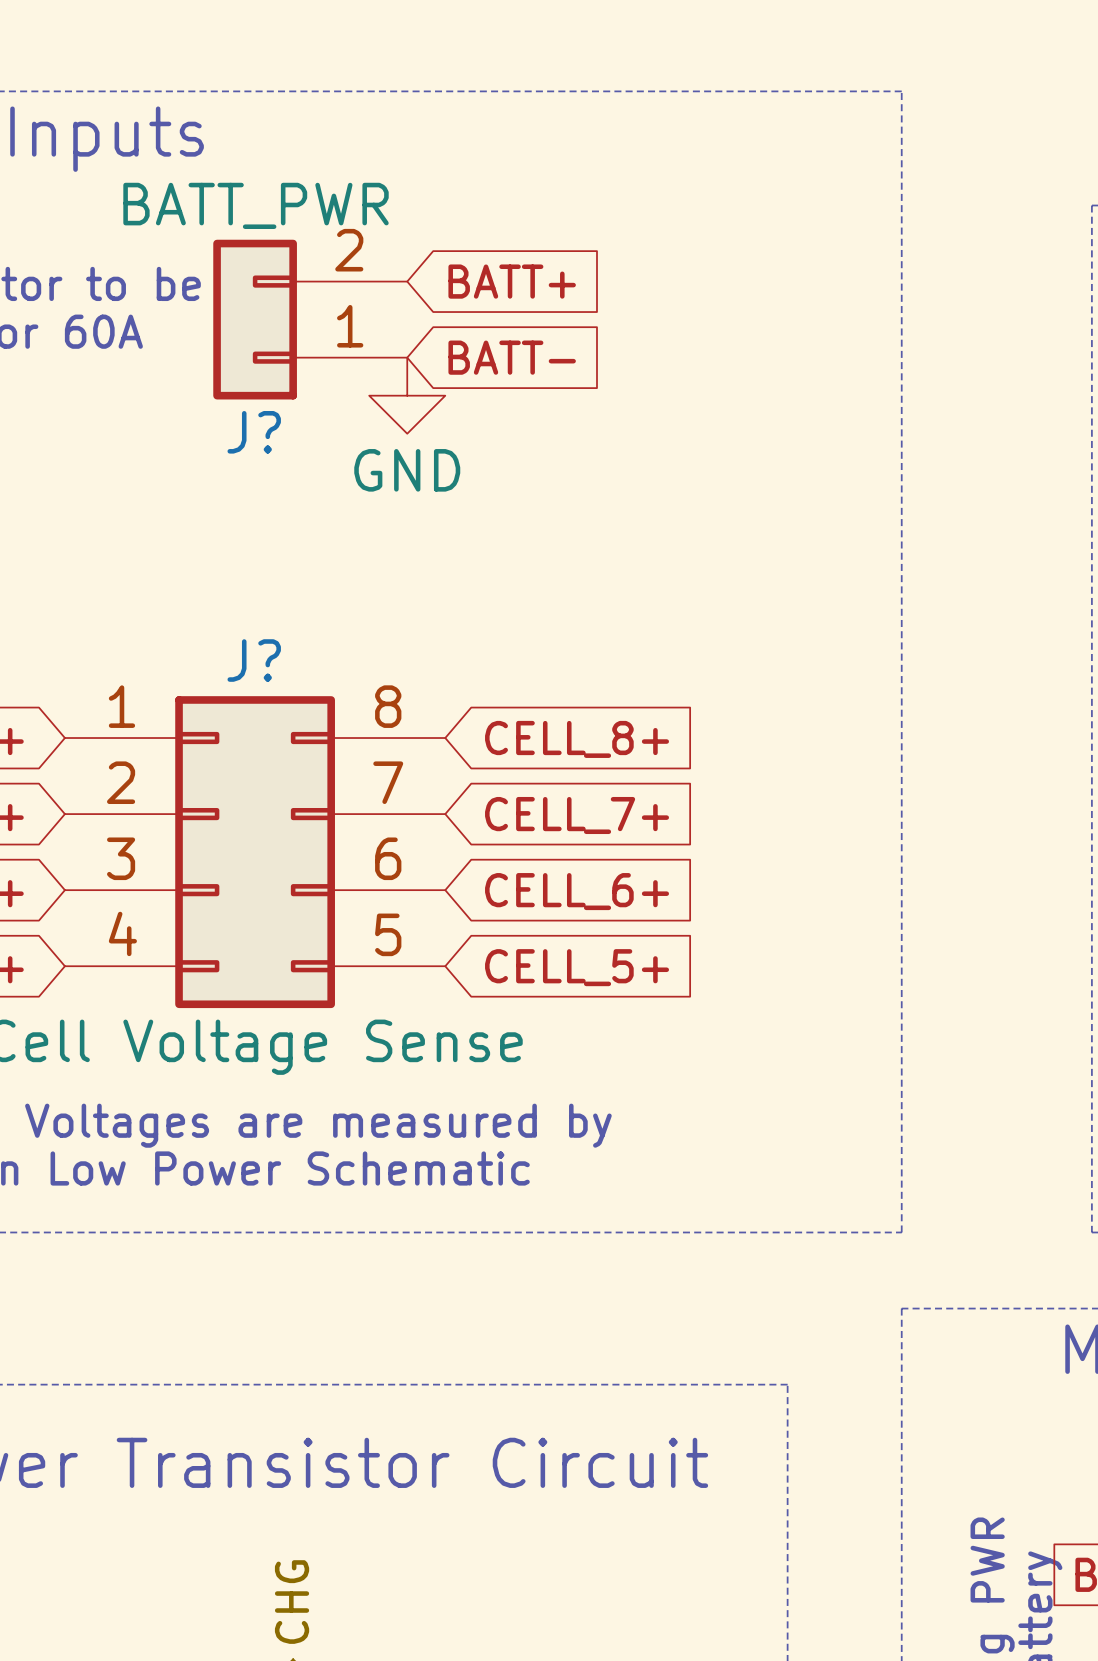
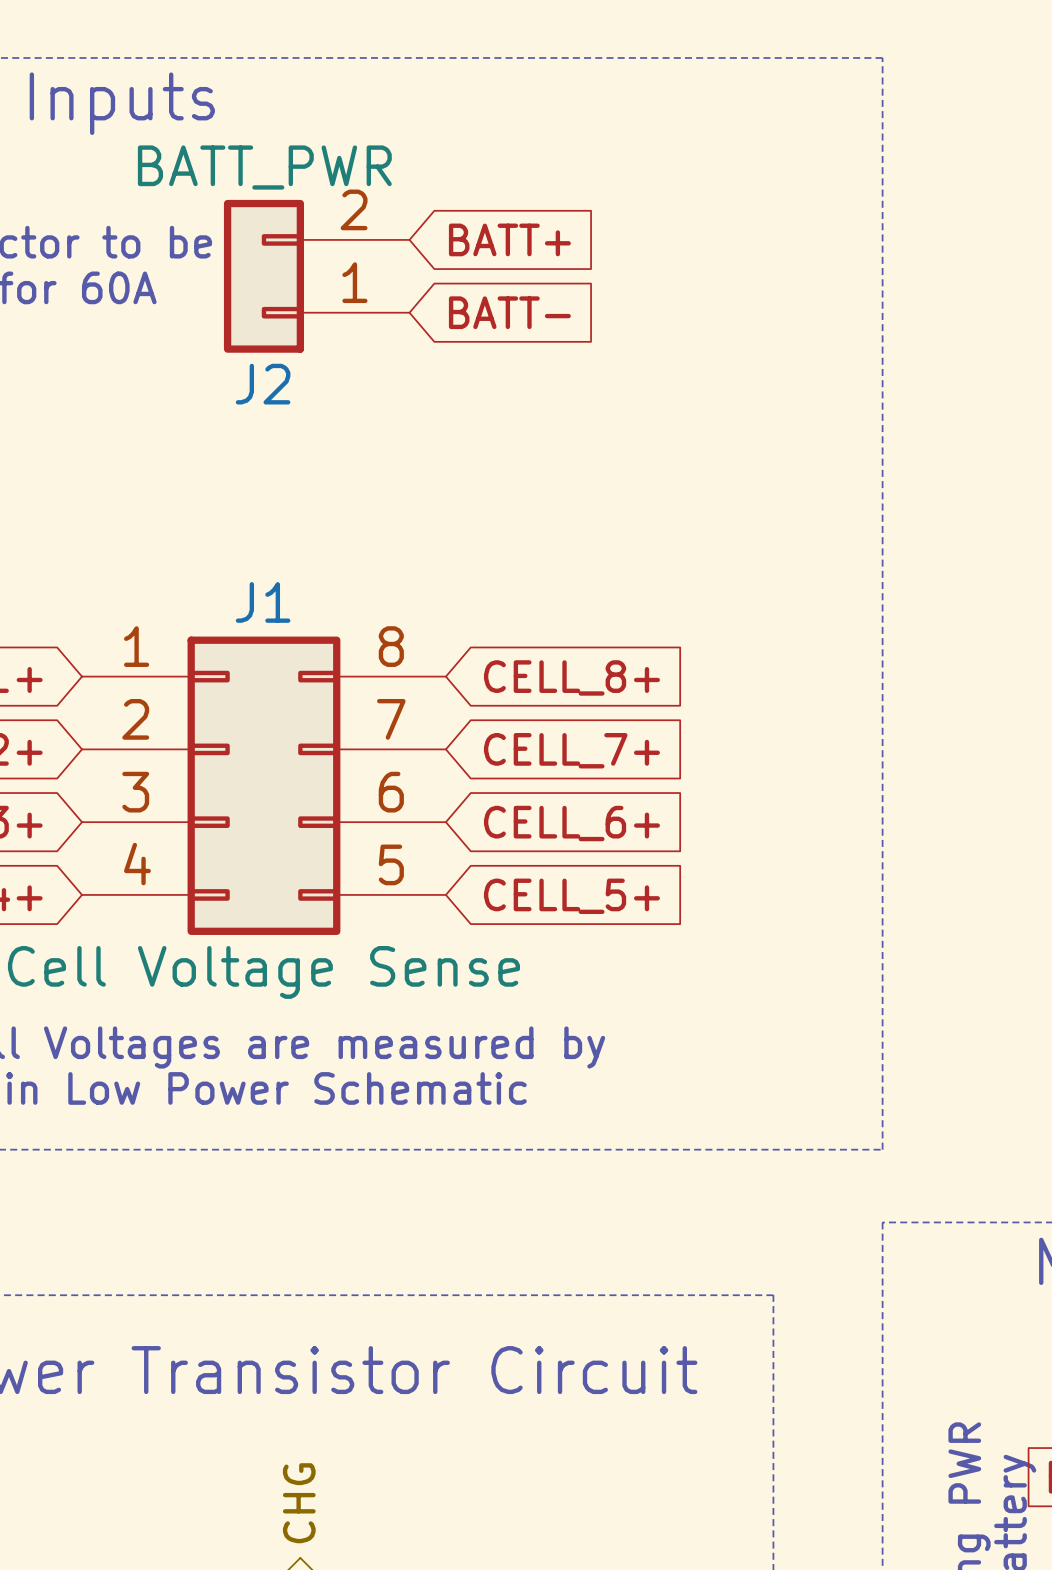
power symbol: GND (407, 395) -> none
J? name: J? (254, 432) -> J2 (263, 384)
J? name: J? (254, 660) -> J1 (263, 602)

